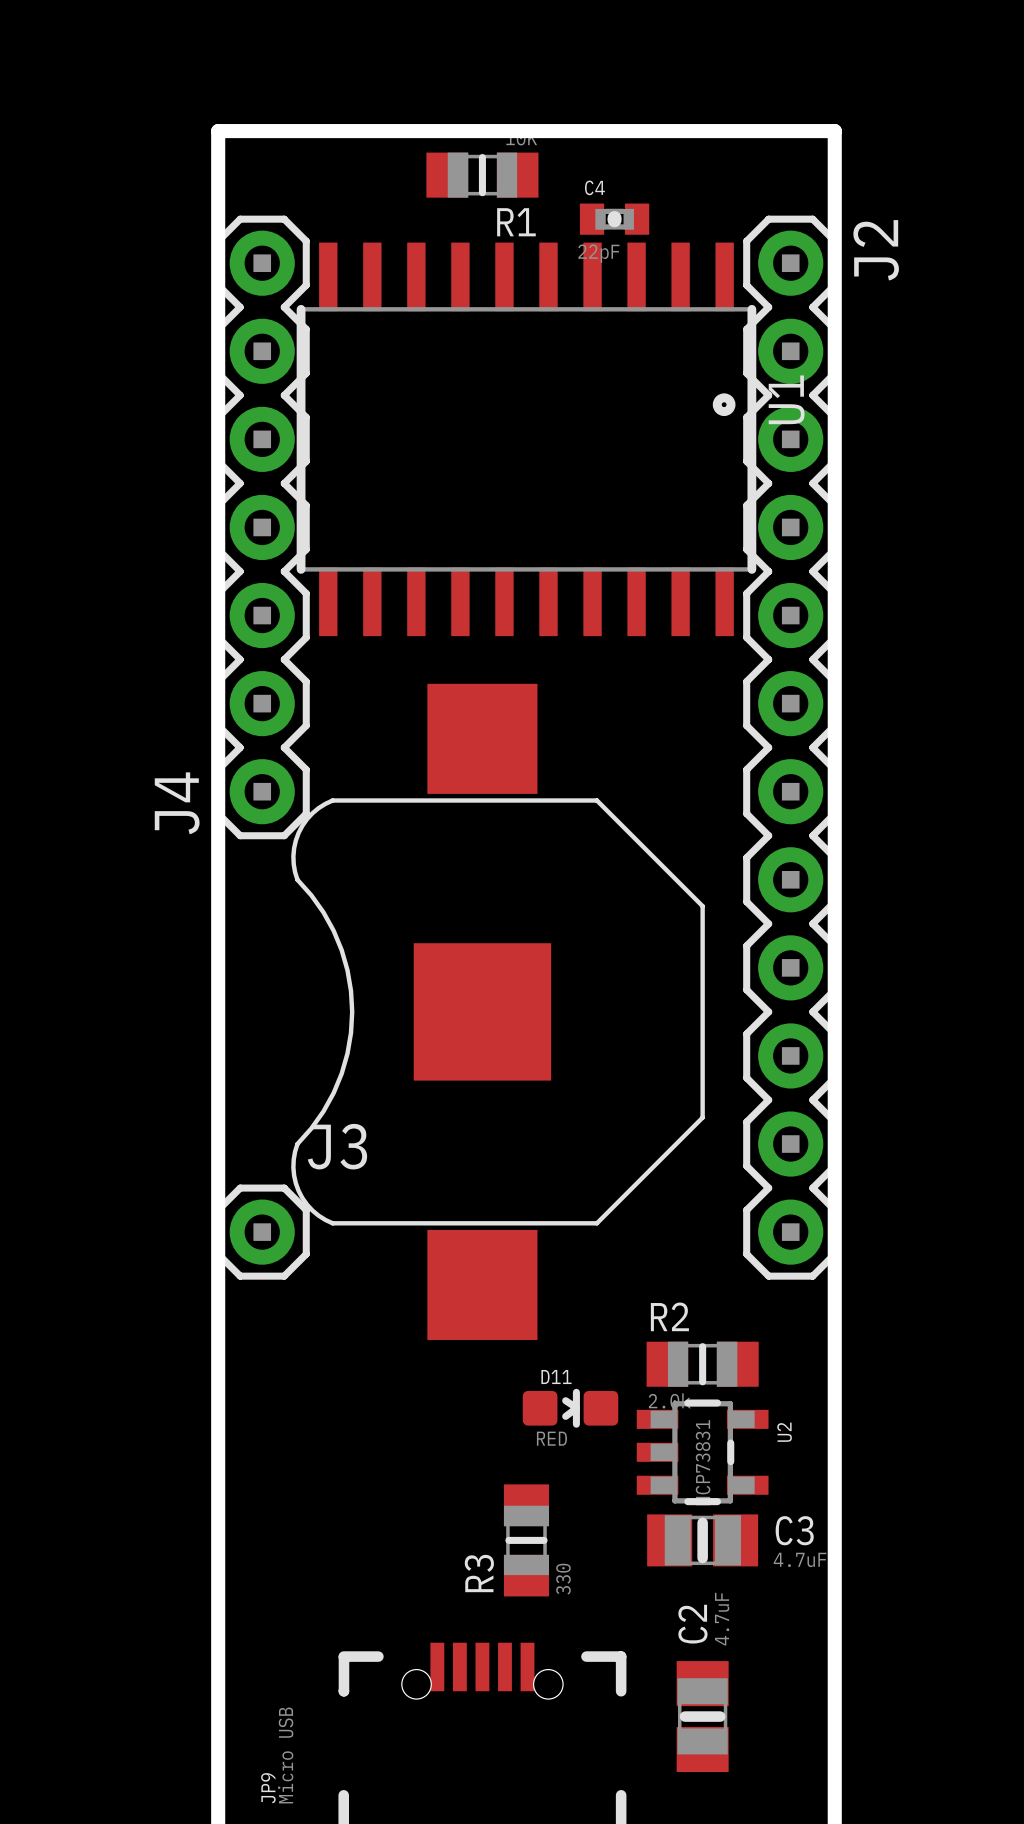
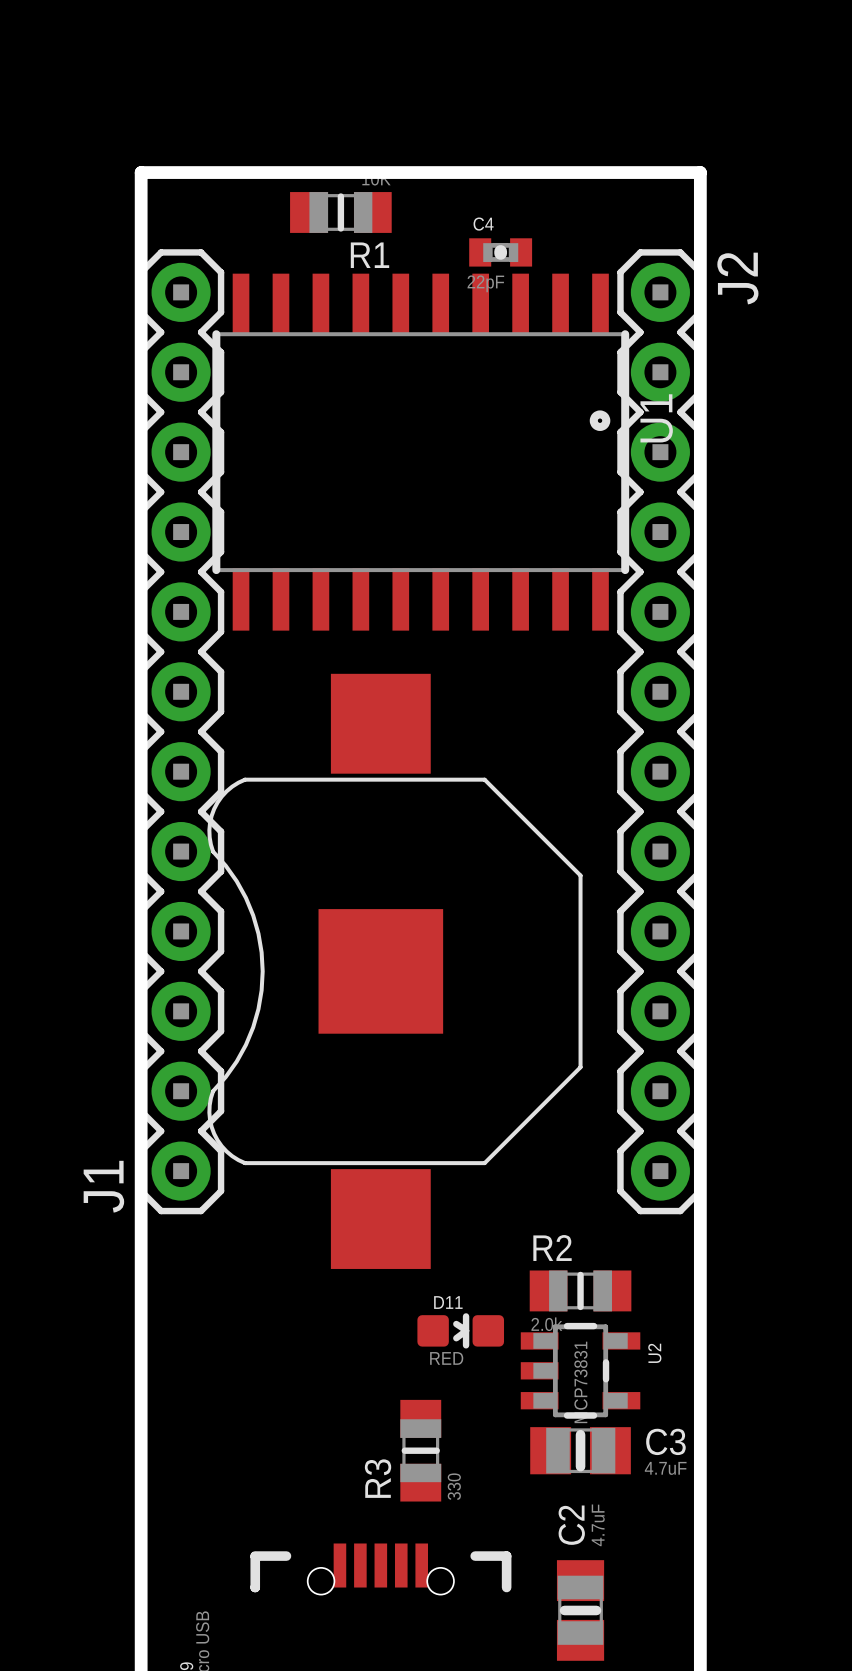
R1 position: (482, 175) -> (340, 212)
J4: (262, 527) -> none
J1: none -> (181, 731)
J3: (262, 1232) -> none

